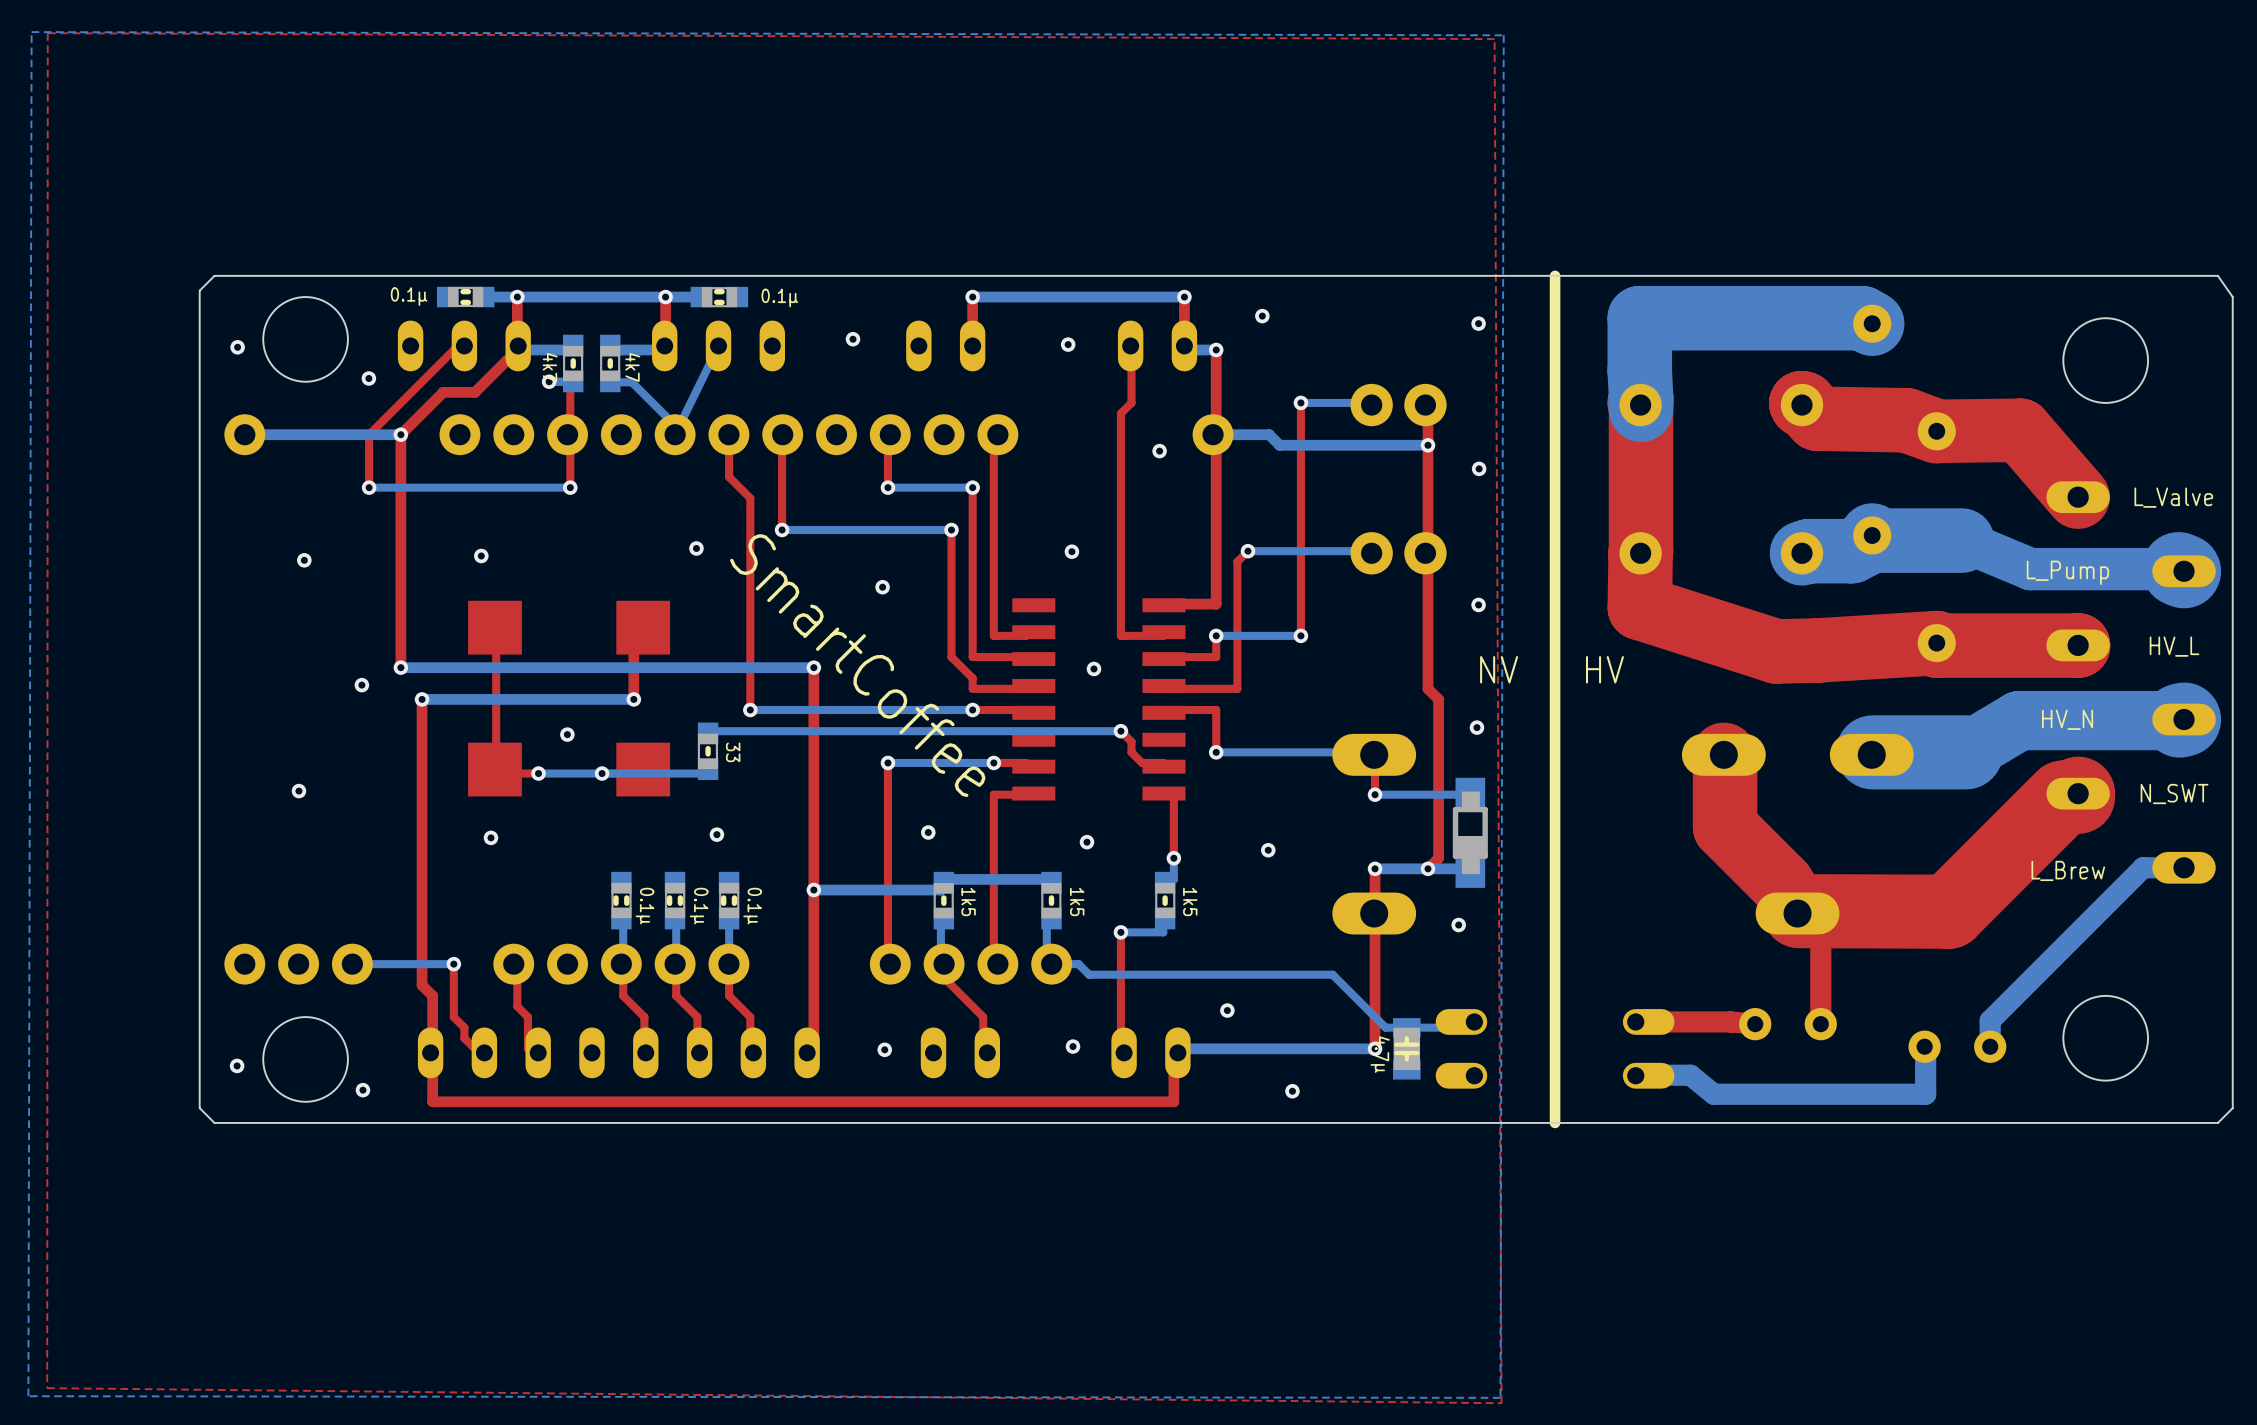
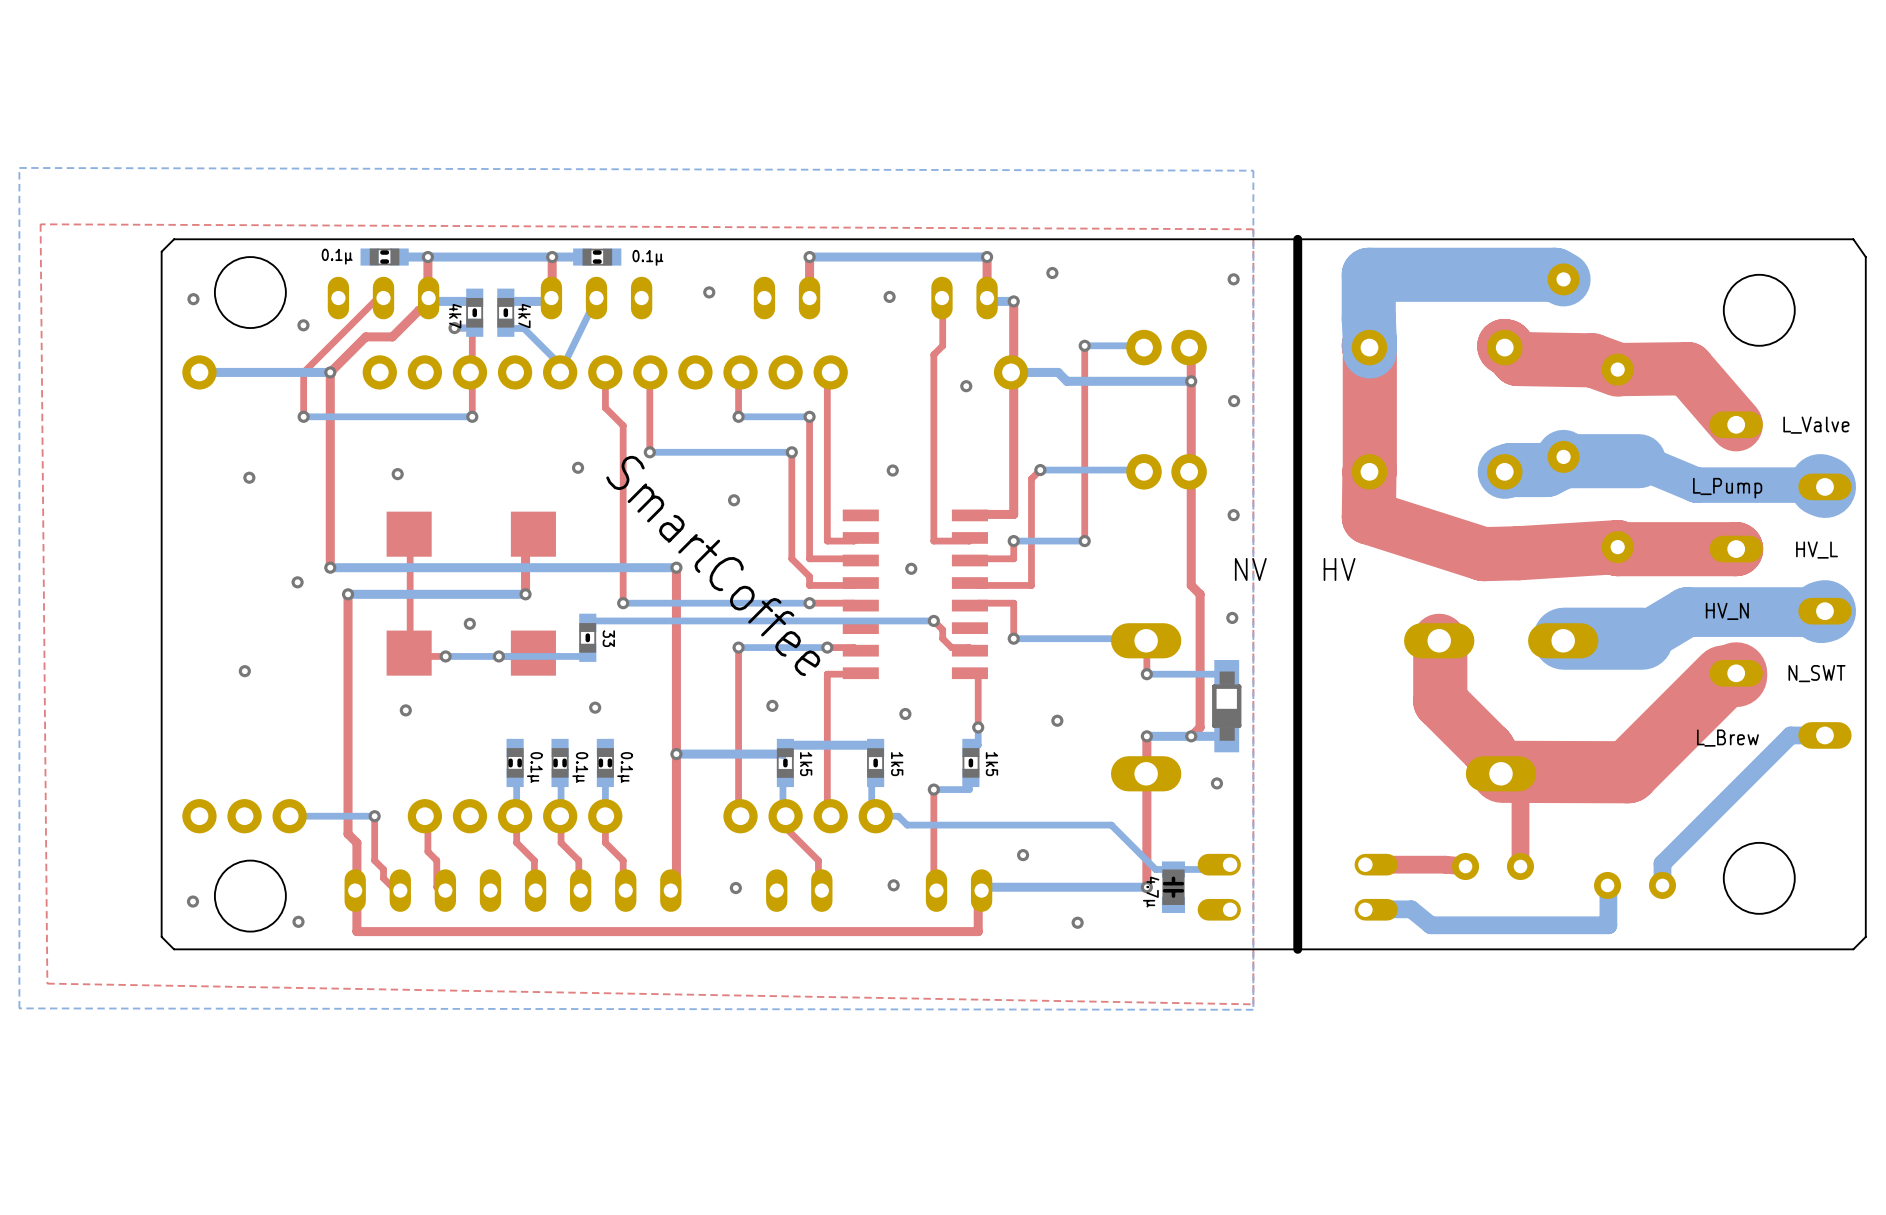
bottom zone outline: (31, 32) (28, 1396) (1500, 1397) (1503, 35) (31, 32) -> (19, 167) (1253, 170) (1253, 1009) (19, 1008) (19, 167)
top zone outline: (47, 33) (47, 1388) (1501, 1403) (1494, 39) (47, 33) -> (40, 224) (1253, 229) (1253, 1004) (47, 983) (40, 224)

